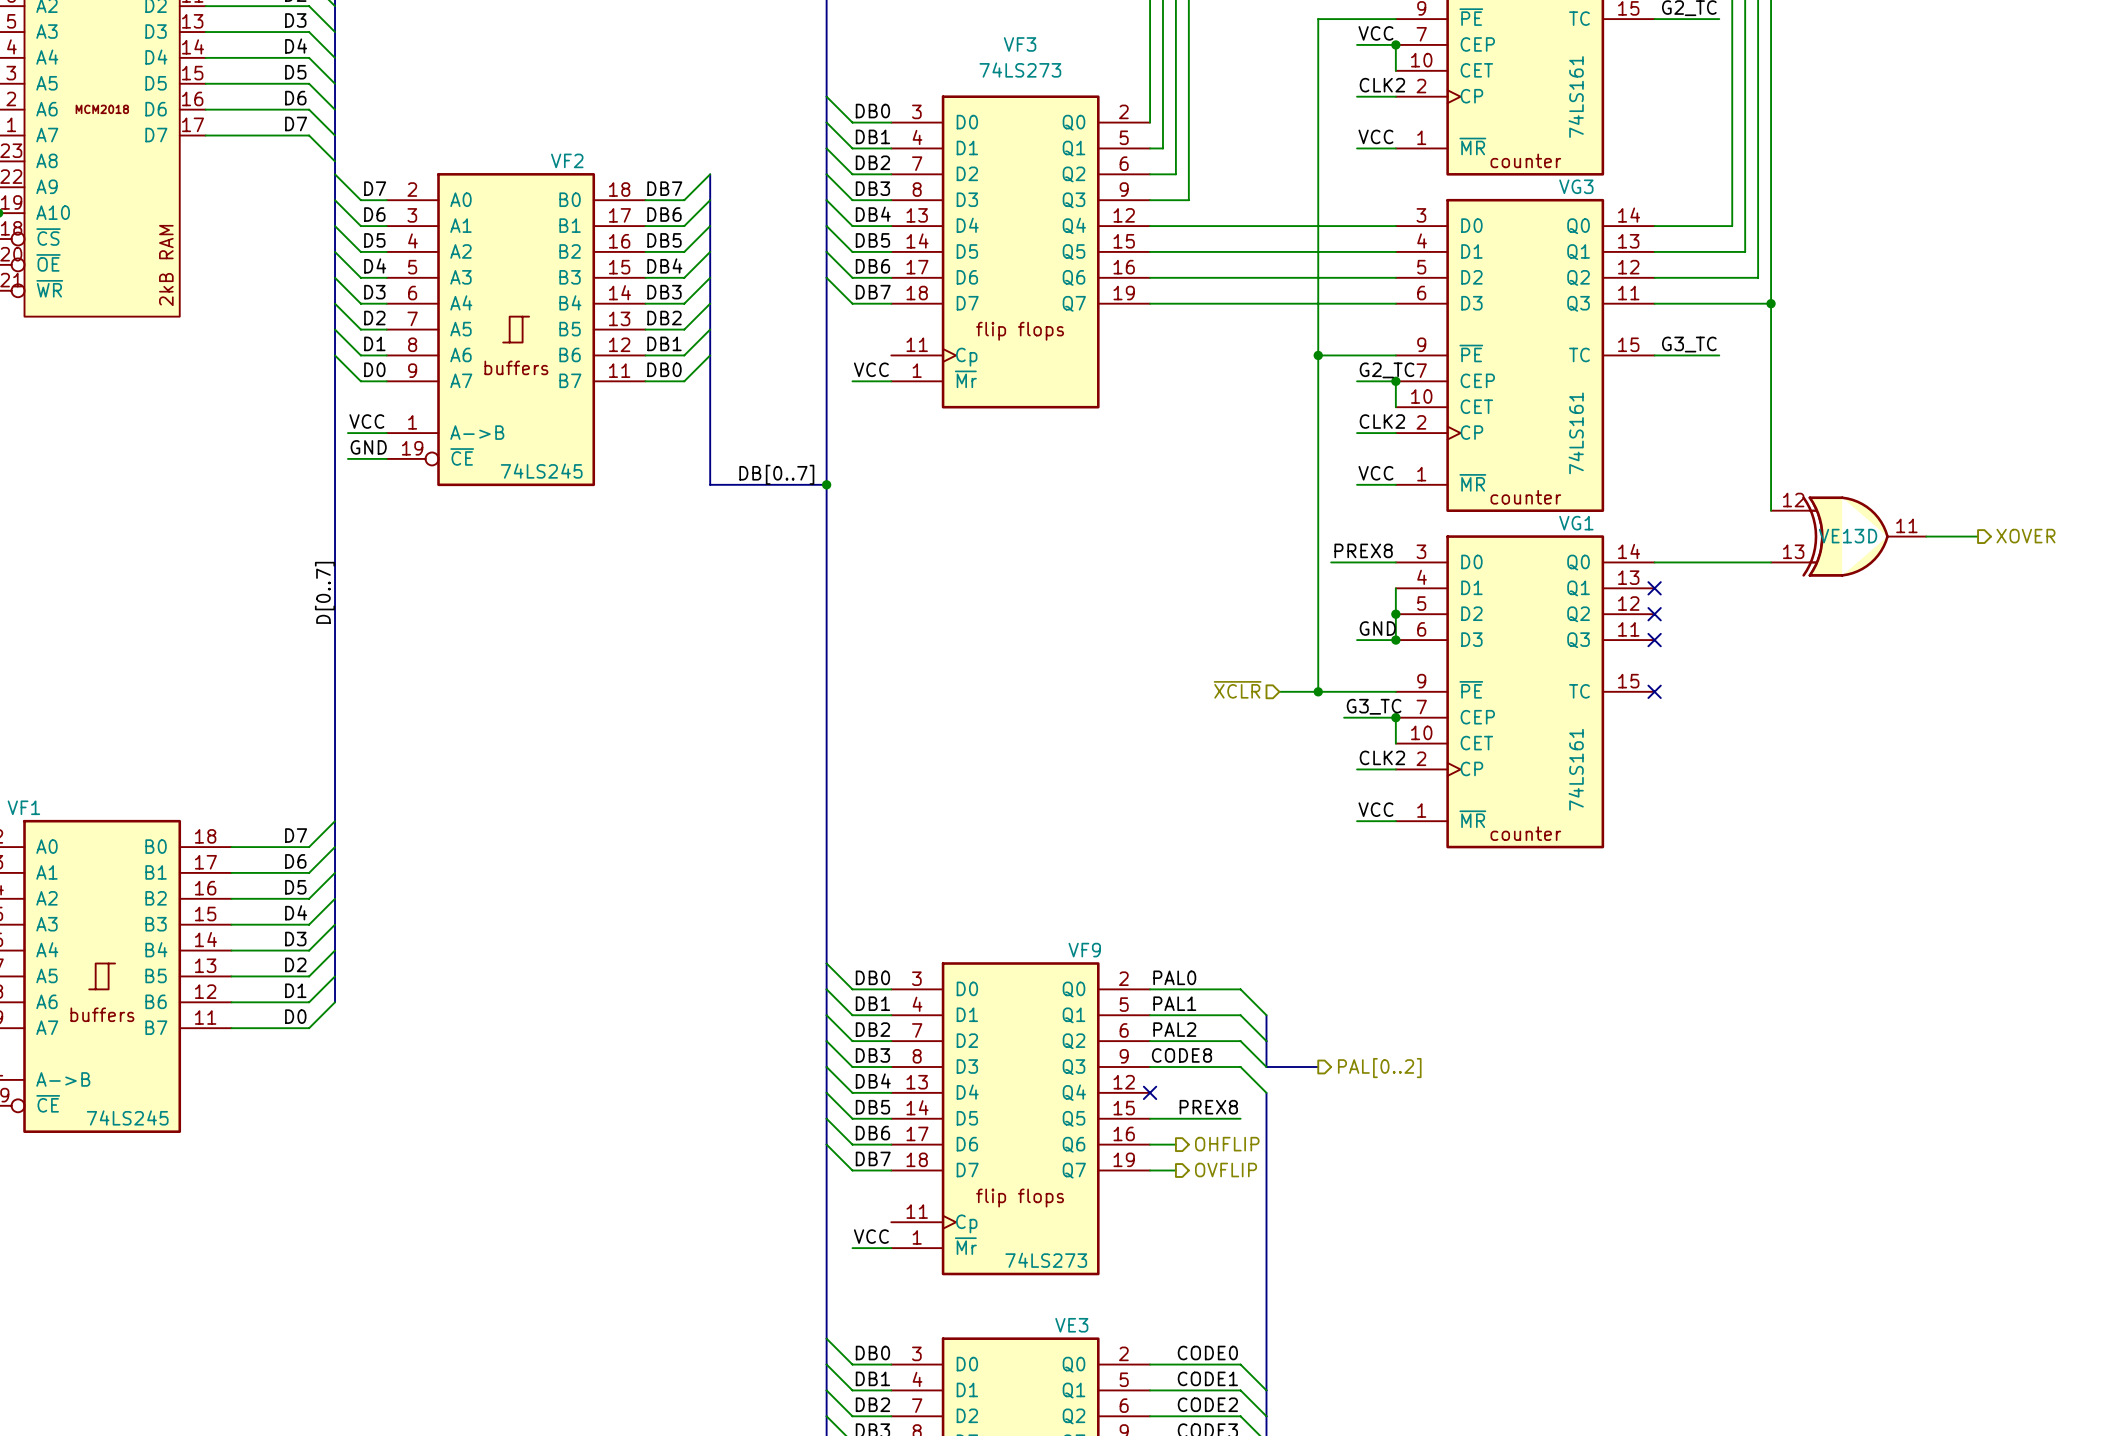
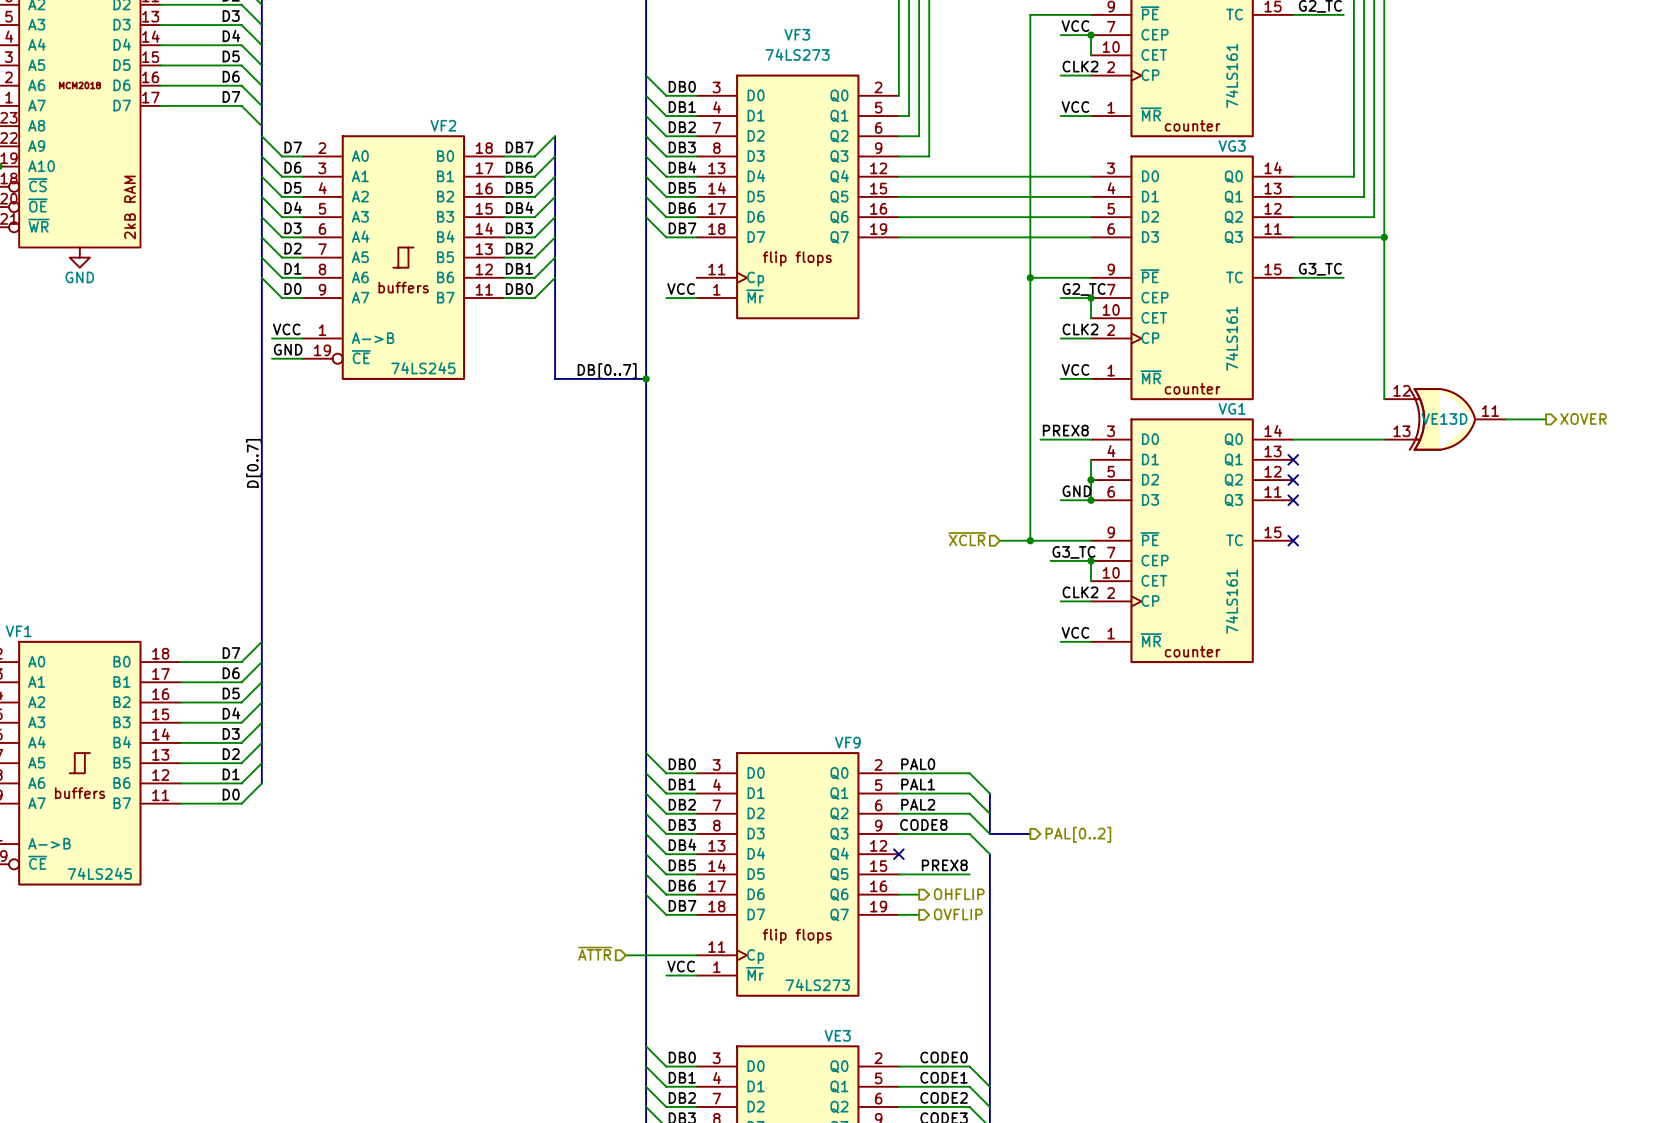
power symbol: none -> GND (79, 257)
hierarchical label: none -> ~{ATTR} (595, 953)
wire: none -> (625, 955) (696, 955)

